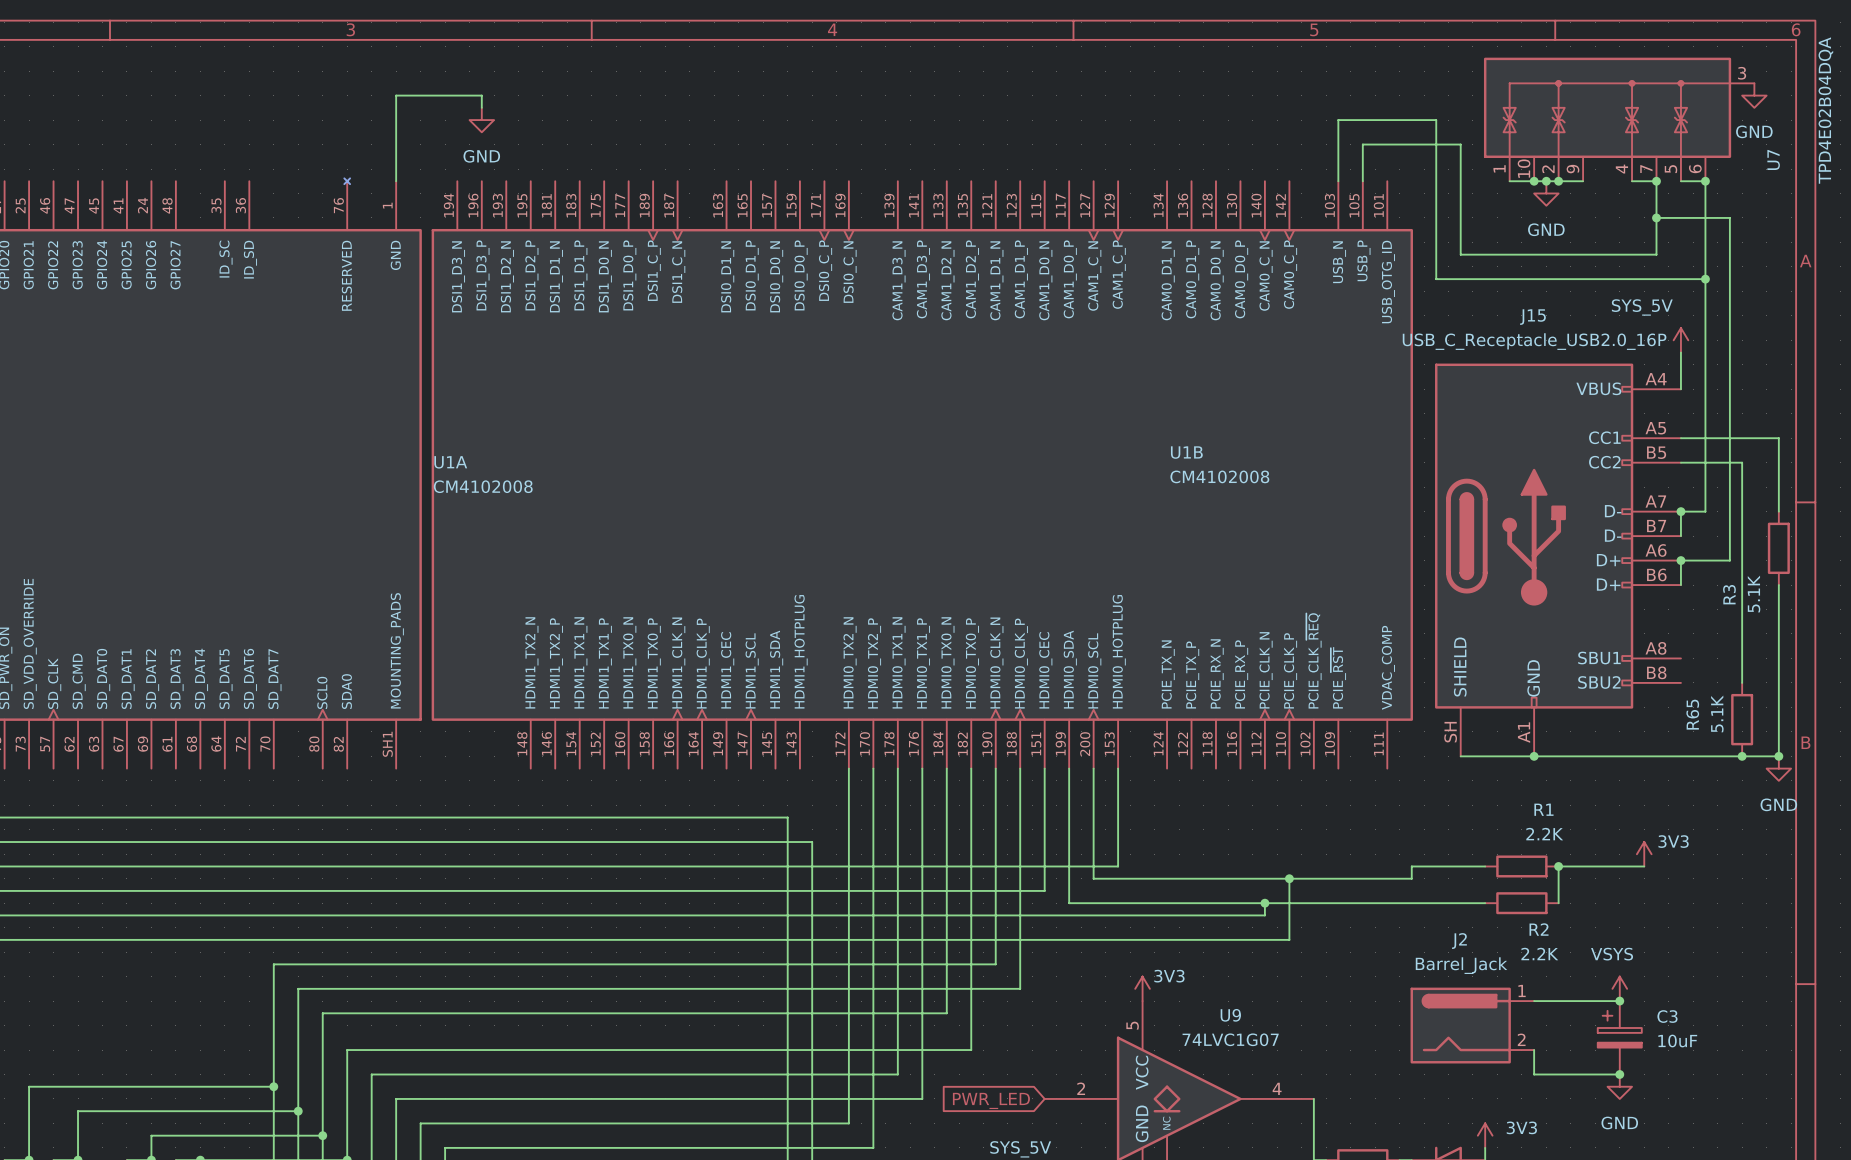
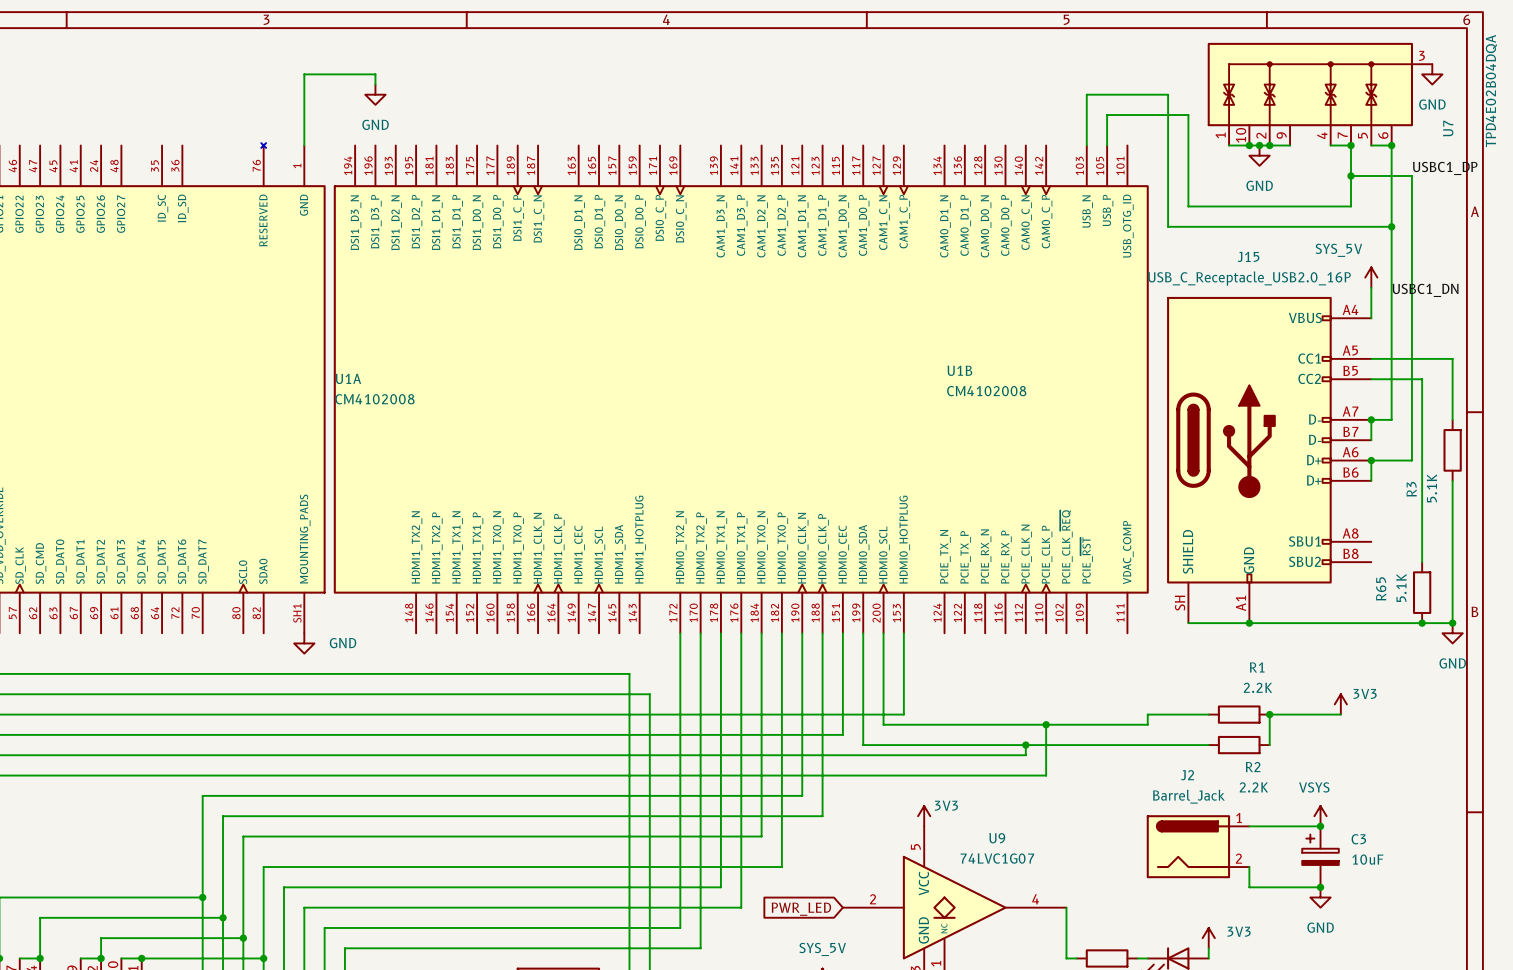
label: none -> USBC1_DP (1445, 168)
label: none -> USBC1_DN (1425, 290)
power symbol: none -> GND (304, 643)

